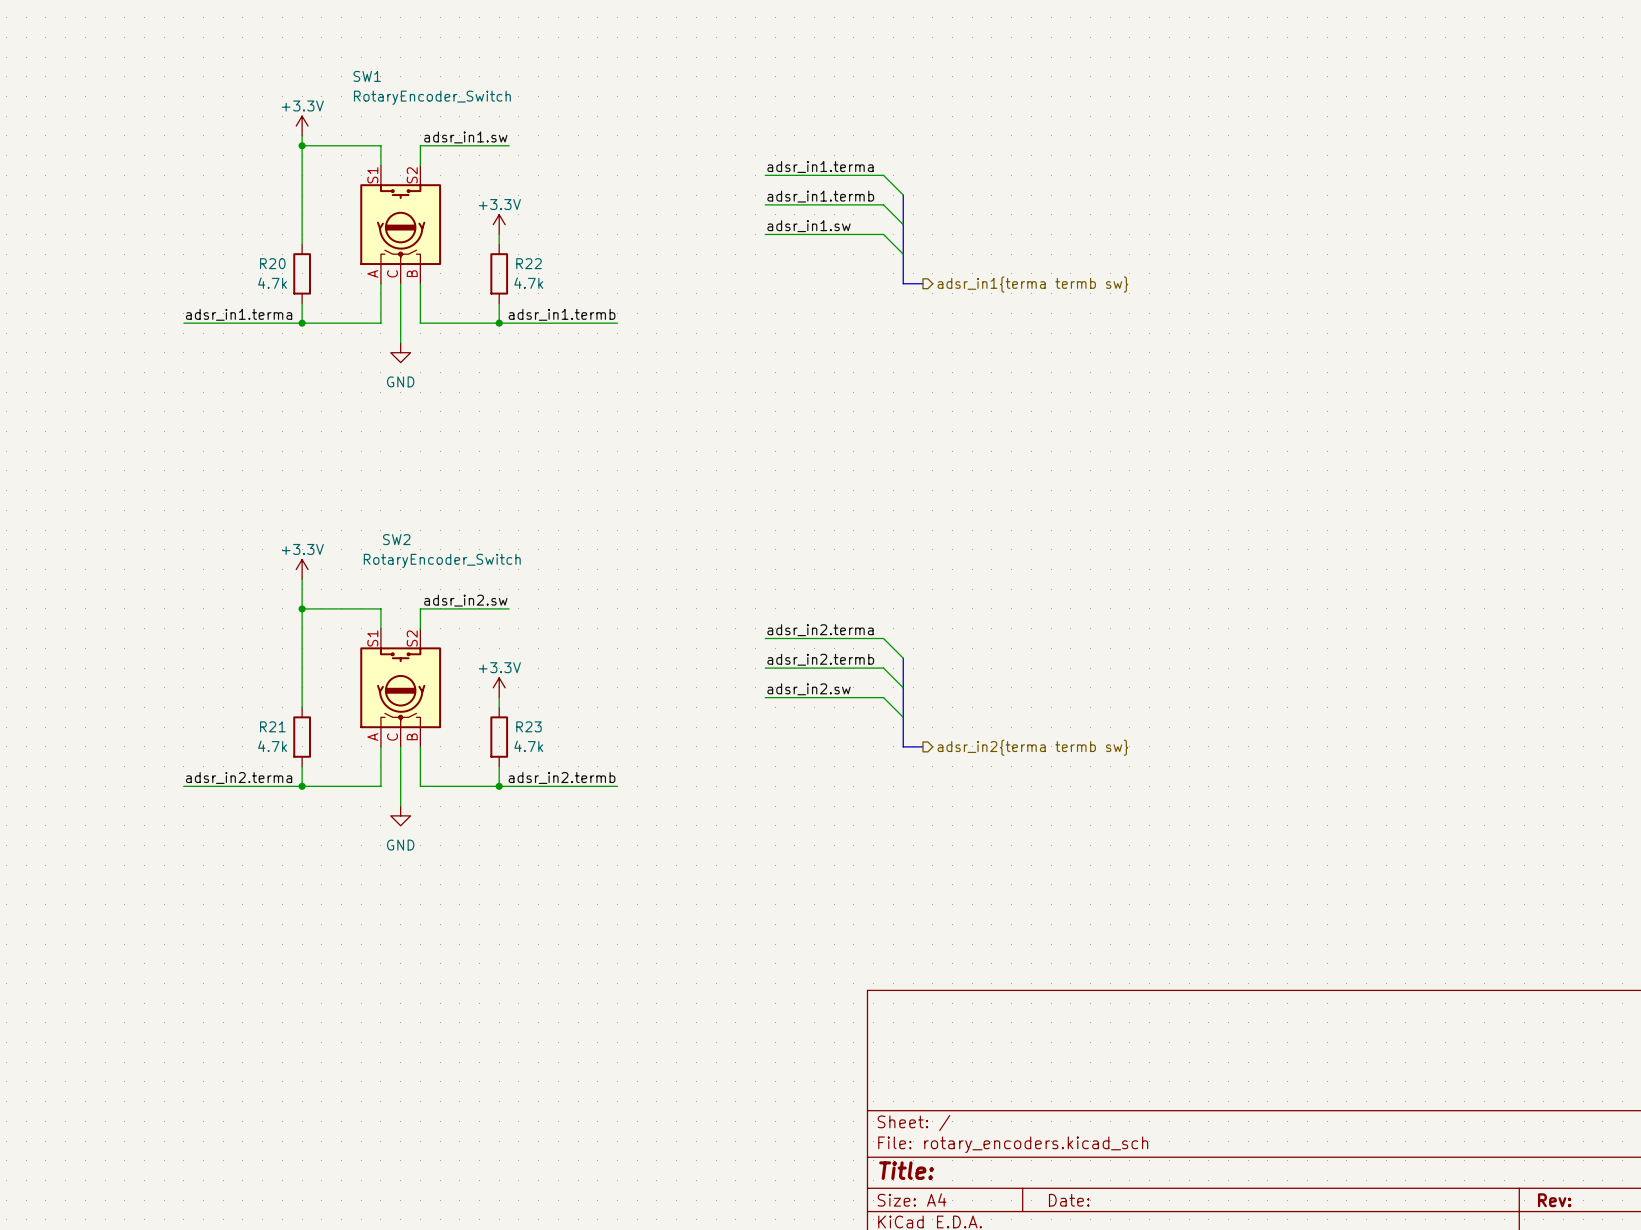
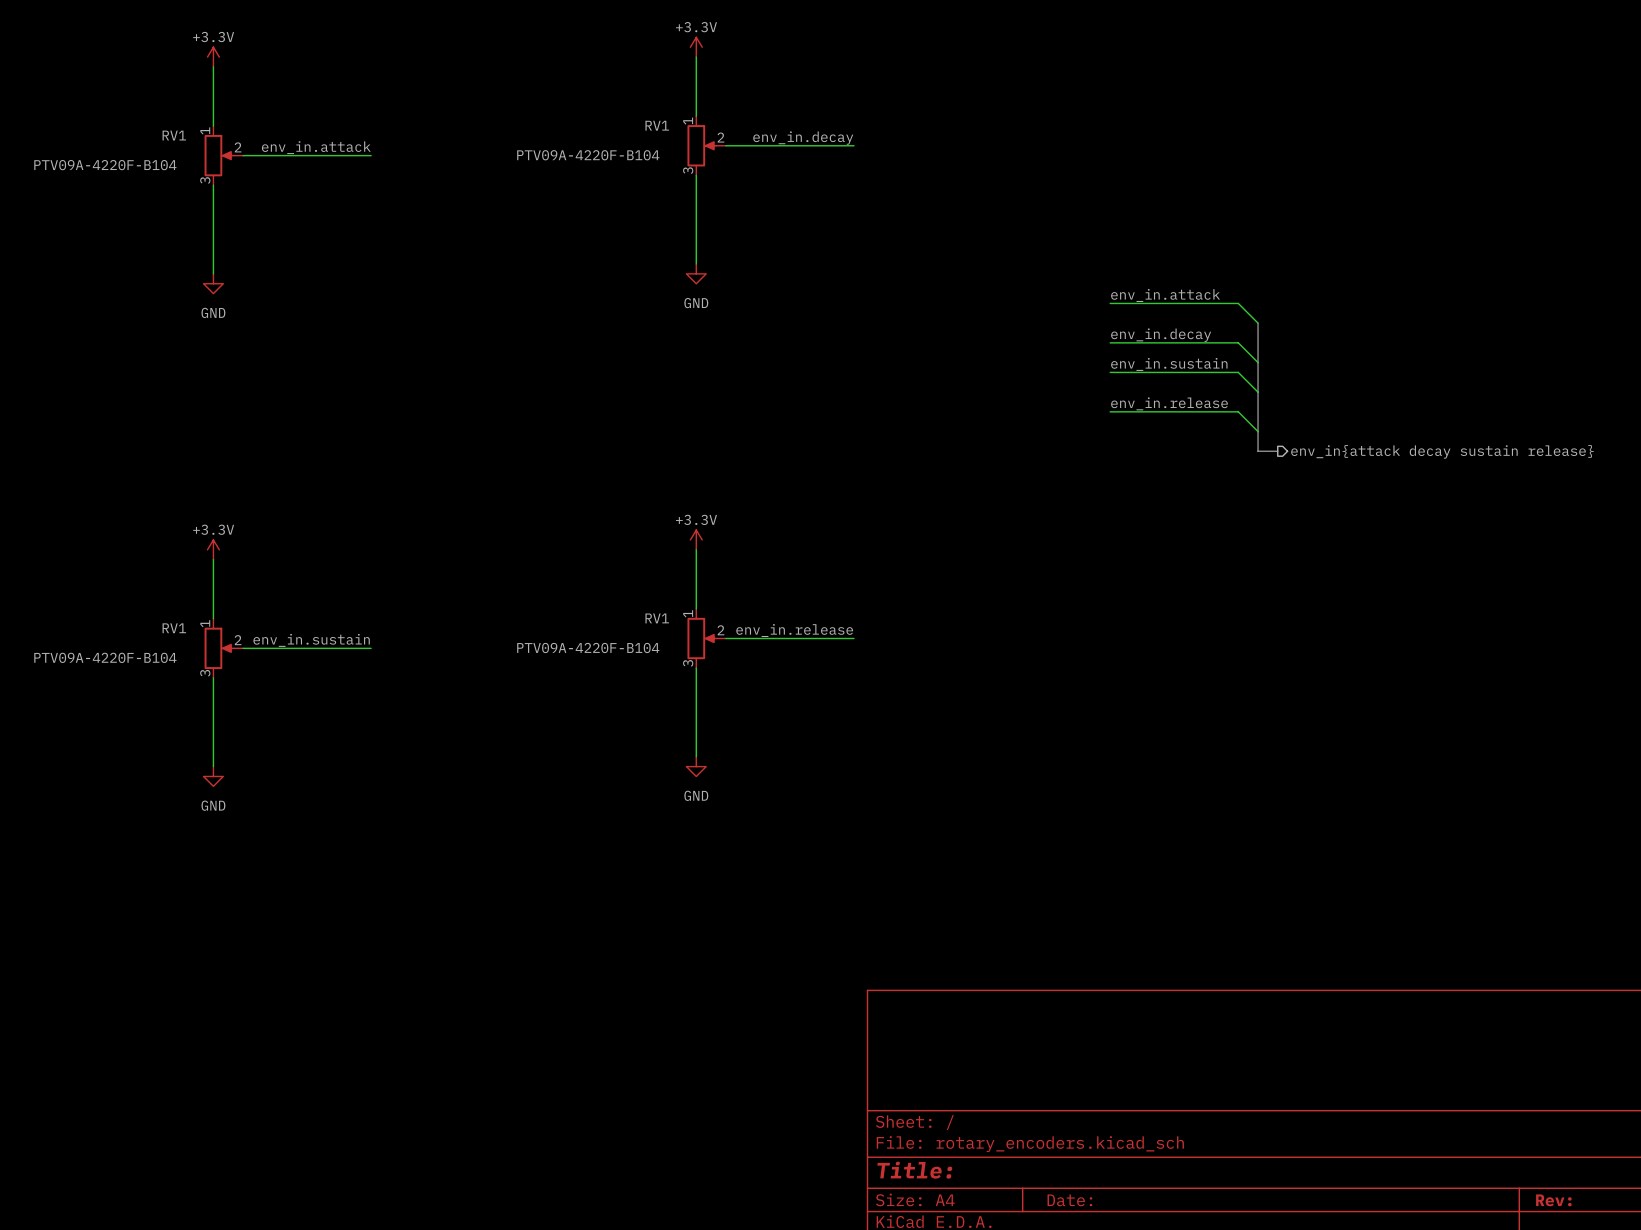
power symbol: none -> +3.3V (696, 47)
wire: none -> (696, 57) (696, 116)
wire: none -> (213, 66) (213, 126)
power symbol position: +3.3V (302, 126) -> +3.3V (213, 57)
wire: (302, 135) (302, 244) -> none
label: adsr_in1.sw (465, 137) -> none
label: none -> env_in.decay (803, 138)
wire: (302, 145) (380, 145) (380, 165) -> none
junction: (302, 145) -> none
wire: (509, 145) (420, 145) (420, 165) -> none
RV1: none -> PTV09A-4220F-B104 (706, 145)
wire: none -> (725, 145) (853, 145)
label: none -> env_in.attack (316, 147)
RV1: none -> PTV09A-4220F-B104 (223, 155)
wire: none -> (242, 155) (371, 155)
label: adsr_in1.terma (820, 167) -> none
wire: none -> (696, 175) (696, 264)
wire: (765, 175) (883, 175) (903, 195) -> none
wire: none -> (213, 185) (213, 273)
bus: (903, 195) (903, 283) (922, 283) -> none
label: adsr_in1.termb (820, 196) -> none
wire: (765, 204) (883, 204) (903, 224) -> none
SW1: RotaryEncoder_Switch (400, 224) -> none
power symbol: +3.3V (499, 224) -> none
label: adsr_in1.sw (809, 226) -> none
wire: (499, 234) (499, 244) -> none
wire: (765, 234) (883, 234) (903, 254) -> none
R20: 4.7k (302, 273) -> none
R22: 4.7k (499, 273) -> none
power symbol: none -> GND (696, 273)
power symbol: none -> GND (213, 283)
wire: (380, 283) (380, 323) (183, 323) -> none
wire: (400, 283) (400, 342) -> none
wire: (420, 283) (420, 323) (617, 323) -> none
hierarchical label: adsr_in1{terma termb sw} (1032, 284) -> none
label: none -> env_in.attack (1165, 295)
wire: (302, 303) (302, 323) -> none
wire: (499, 303) (499, 323) -> none
wire: none -> (1110, 303) (1238, 303) (1258, 323)
label: adsr_in1.terma (239, 314) -> none
label: adsr_in1.termb (562, 314) -> none
junction: (302, 323) -> none
junction: (499, 323) -> none
bus: none -> (1258, 323) (1258, 451) (1277, 451)
label: none -> env_in.decay (1161, 335)
wire: none -> (1110, 342) (1238, 342) (1258, 362)
power symbol: GND (400, 352) -> none
label: none -> env_in.sustain (1169, 364)
wire: none -> (1110, 372) (1238, 372) (1258, 392)
label: none -> env_in.release (1169, 403)
wire: none -> (1110, 411) (1238, 411) (1258, 431)
hierarchical label: none -> env_in{attack decay sustain release} (1442, 451)
power symbol: none -> +3.3V (696, 539)
wire: none -> (696, 549) (696, 608)
wire: none -> (213, 559) (213, 618)
power symbol position: +3.3V (302, 569) -> +3.3V (213, 549)
wire: (302, 579) (302, 707) -> none
label: adsr_in2.sw (465, 600) -> none
wire: (302, 608) (380, 608) (380, 628) -> none
junction: (302, 608) -> none
wire: (509, 608) (420, 608) (420, 628) -> none
label: none -> env_in.release (794, 630)
label: adsr_in2.terma (820, 630) -> none
RV1: none -> PTV09A-4220F-B104 (706, 638)
wire: none -> (725, 638) (765, 638)
wire: (853, 638) (883, 638) (903, 658) -> none
label: none -> env_in.sustain (311, 640)
RV1: none -> PTV09A-4220F-B104 (223, 648)
wire: none -> (242, 648) (371, 648)
bus: (903, 658) (903, 746) (922, 746) -> none
label: adsr_in2.termb (820, 659) -> none
wire: none -> (696, 668) (696, 756)
wire: (765, 668) (883, 668) (903, 687) -> none
wire: none -> (213, 677) (213, 766)
SW2: RotaryEncoder_Switch (400, 687) -> none
power symbol: +3.3V (499, 687) -> none
label: adsr_in2.sw (809, 689) -> none
wire: (499, 697) (499, 707) -> none
wire: (765, 697) (883, 697) (903, 717) -> none
R21: 4.7k (302, 737) -> none
R23: 4.7k (499, 737) -> none
wire: (380, 746) (380, 786) (183, 786) -> none
wire: (400, 746) (400, 806) -> none
wire: (420, 746) (420, 786) (617, 786) -> none
hierarchical label: adsr_in2{terma termb sw} (1032, 747) -> none
wire: (302, 766) (302, 786) -> none
wire: (499, 766) (499, 786) -> none
power symbol: none -> GND (696, 766)
power symbol: none -> GND (213, 776)
label: adsr_in2.terma (239, 778) -> none
label: adsr_in2.termb (562, 778) -> none
junction: (302, 786) -> none
junction: (499, 786) -> none
power symbol: GND (400, 815) -> none

